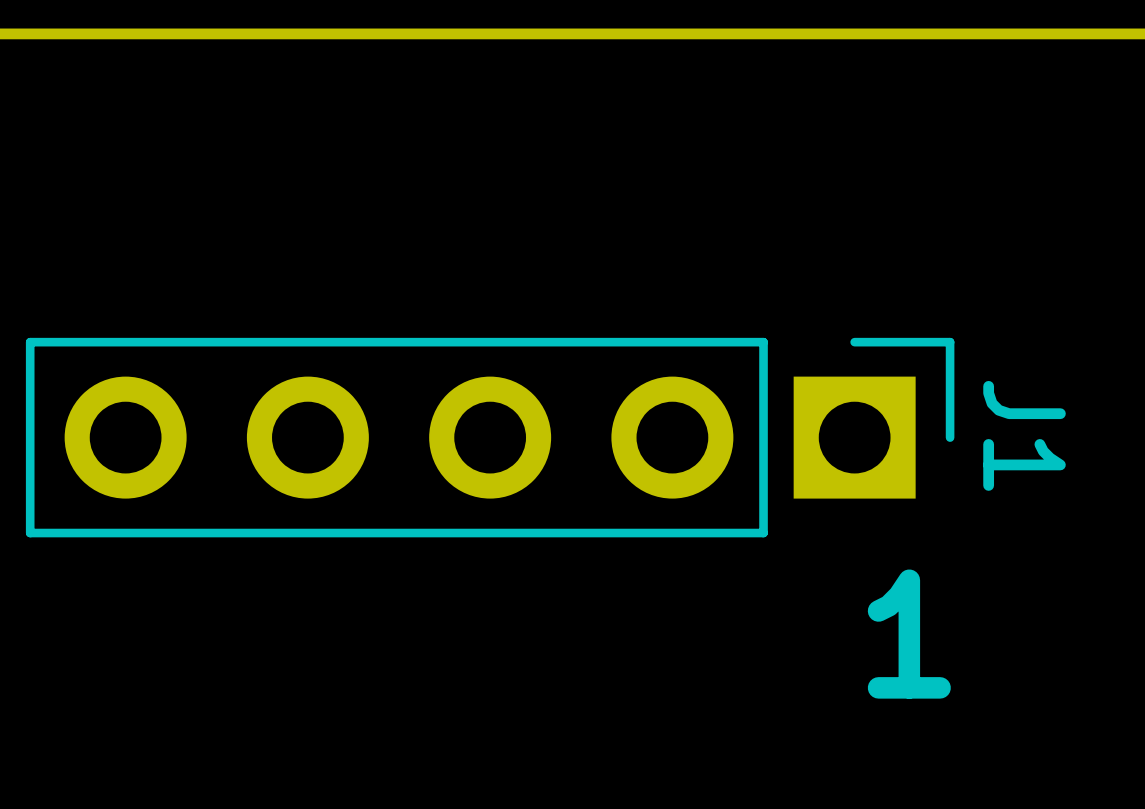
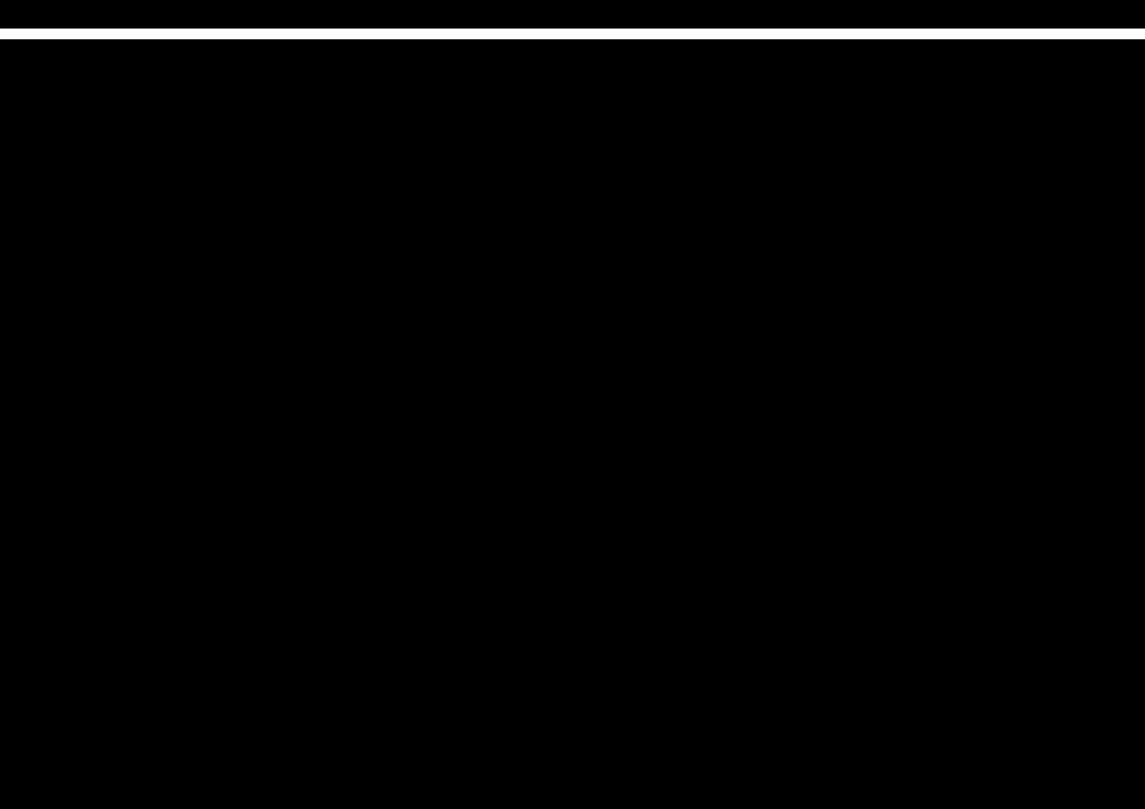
J1: (490, 437) -> none
text: 1 (909, 634) -> none

